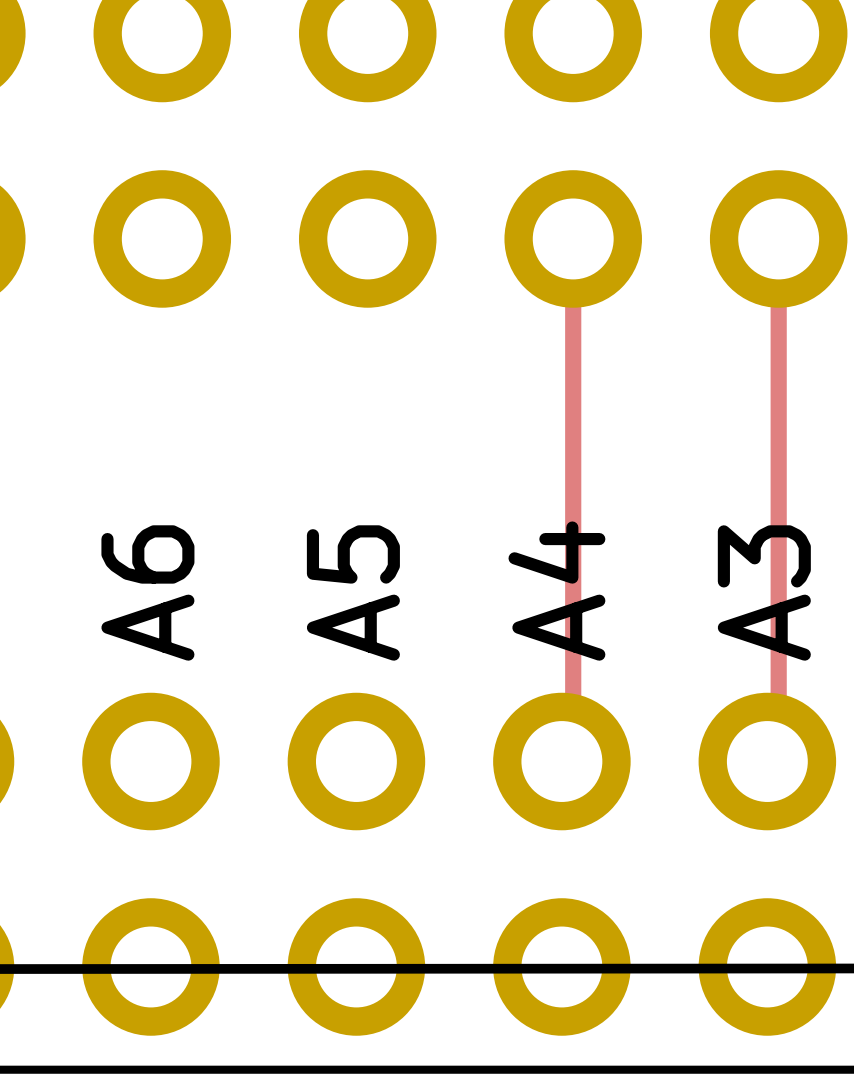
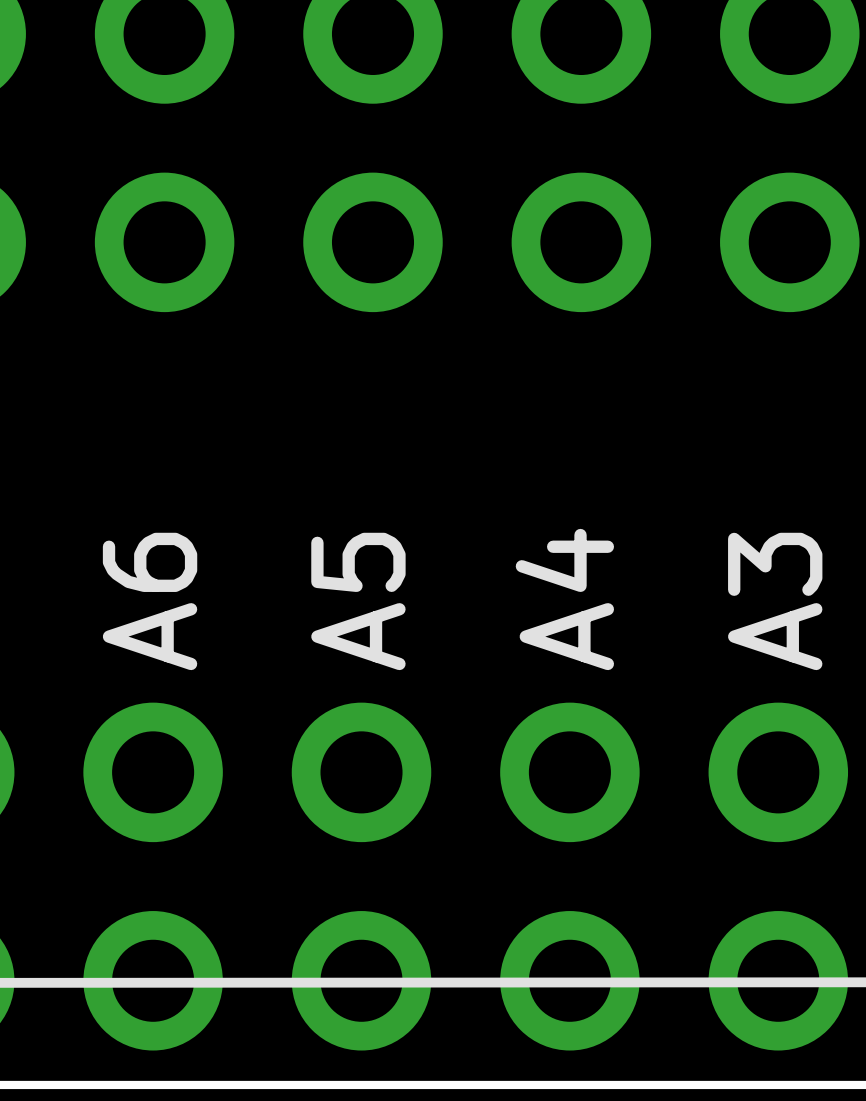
track: (573, 238) (573, 750) (561, 761) -> none
track: (778, 238) (778, 750) (767, 761) -> none

